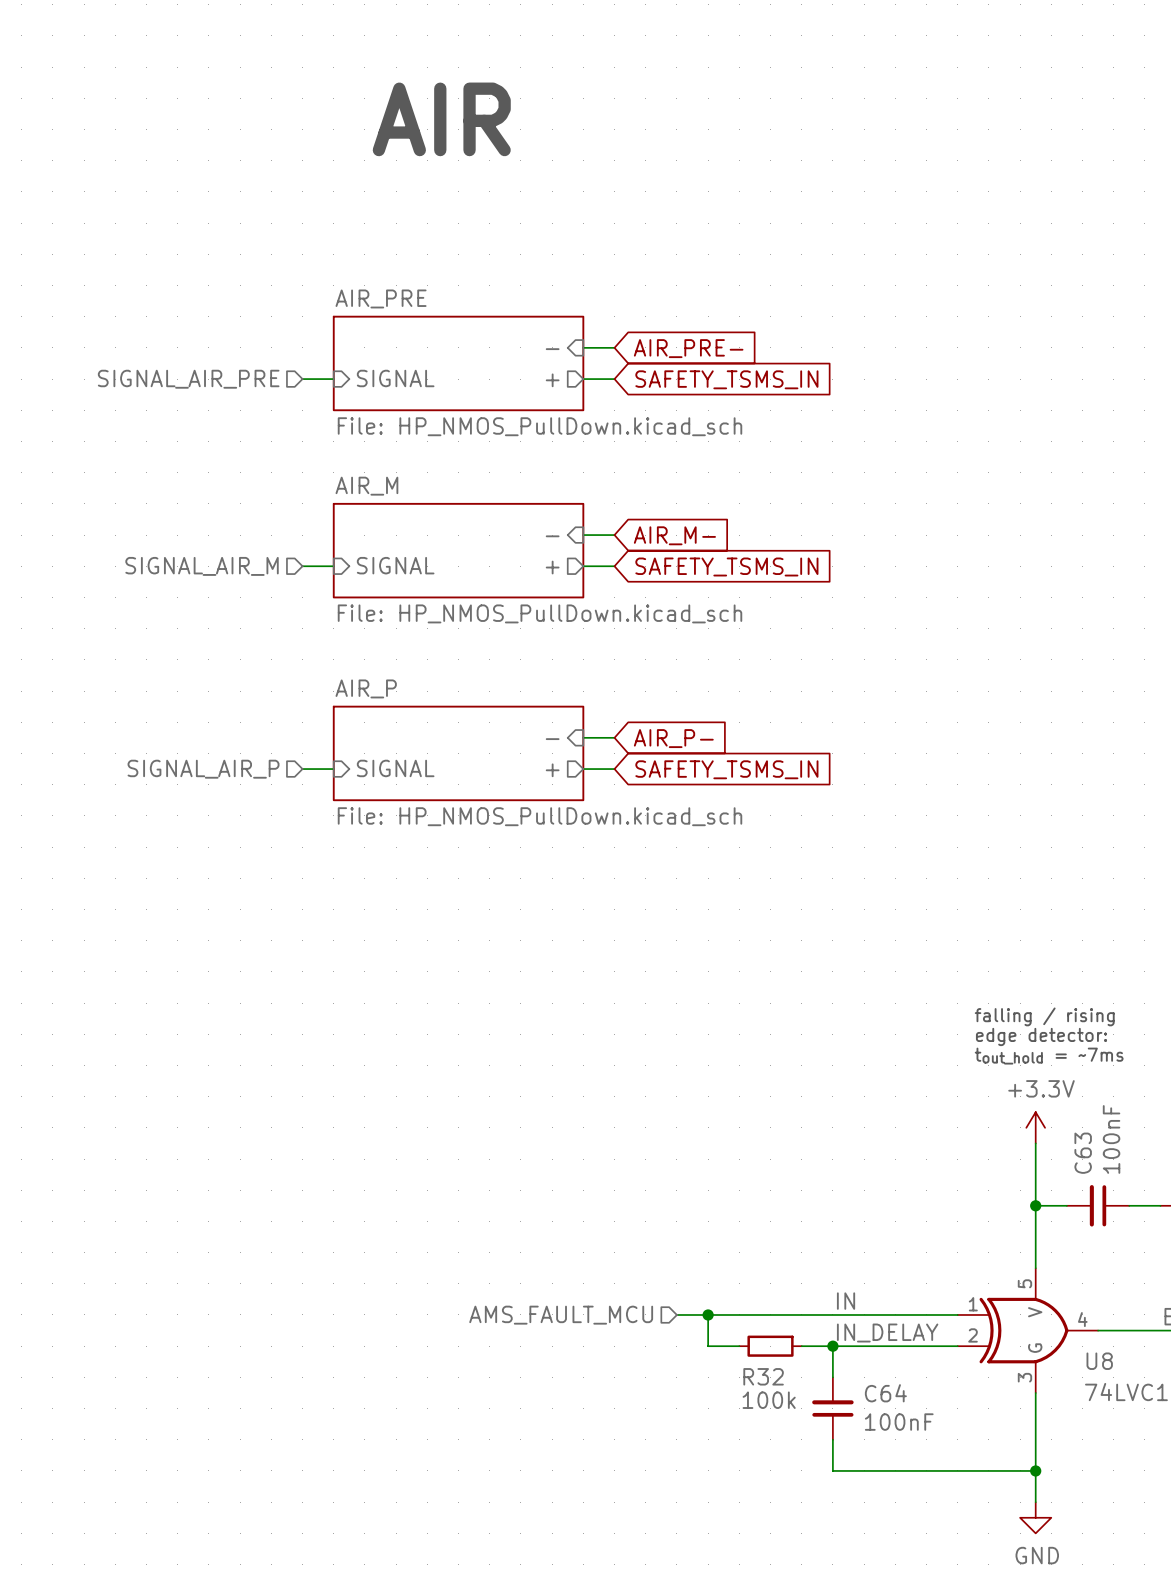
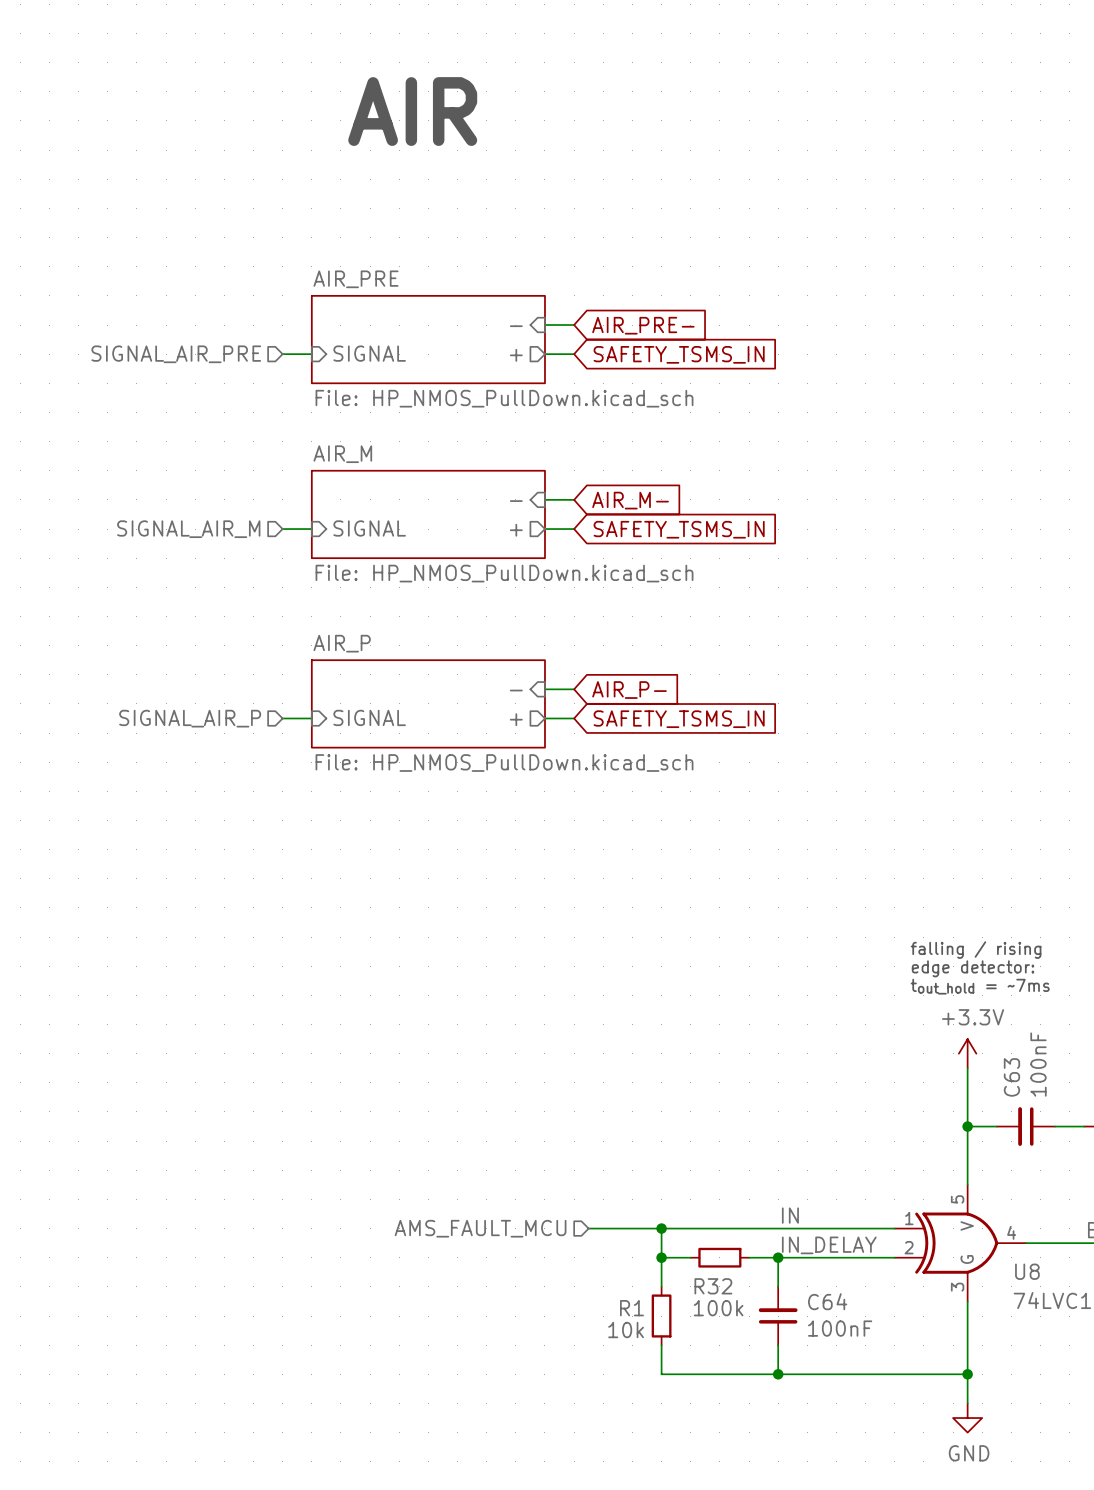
wire: none -> (588, 1228) (632, 1228)
hierarchical label position: AMS_FAULT_MCU (561, 1315) -> AMS_FAULT_MCU (480, 1228)
wire: none -> (661, 1257) (661, 1286)
junction: none -> (661, 1257)
R1: none -> 10k (661, 1316)
wire: none -> (661, 1345) (661, 1374) (778, 1374)
junction: none -> (778, 1374)

